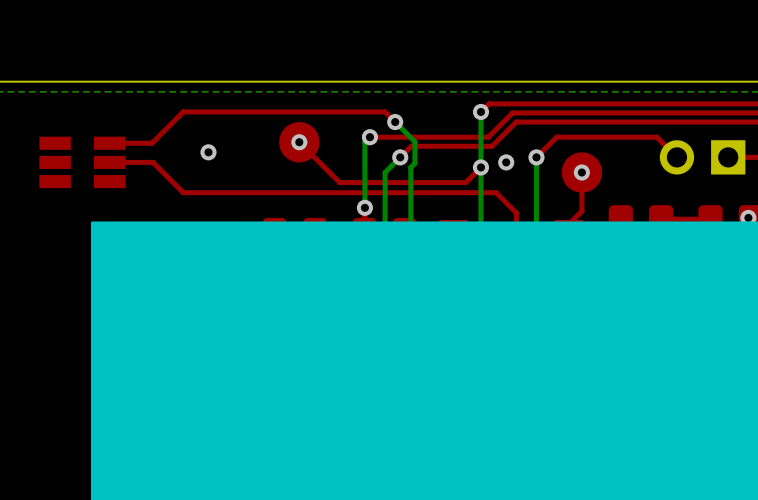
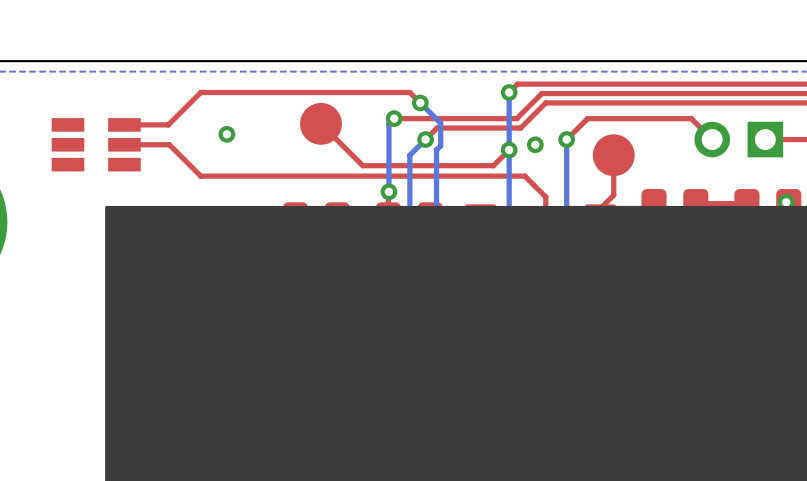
via: (299, 142) -> none
via: (581, 172) -> none

